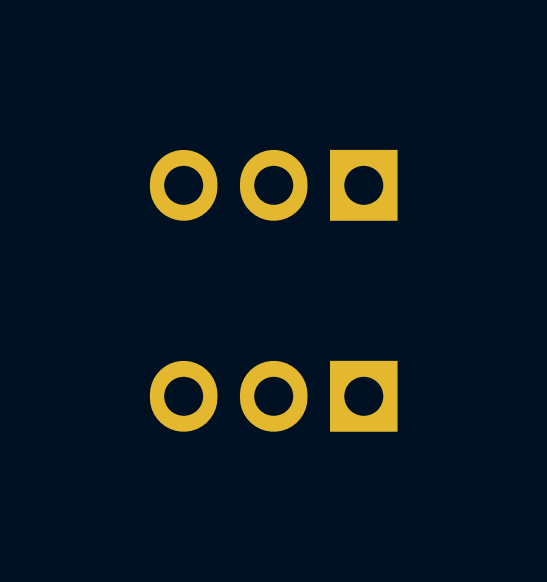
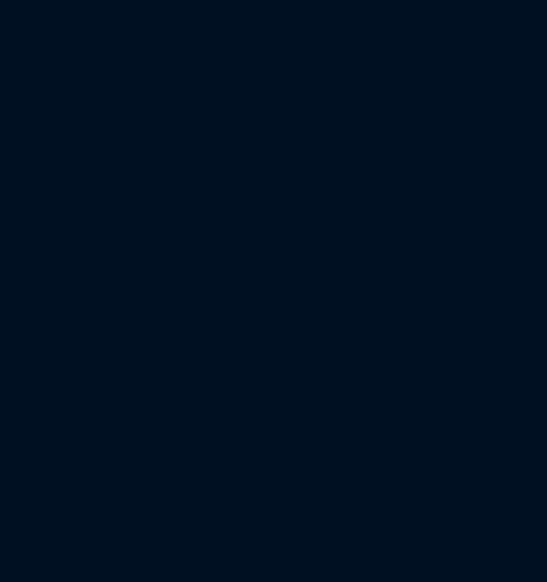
part: (273, 185) -> none
part: (273, 396) -> none

